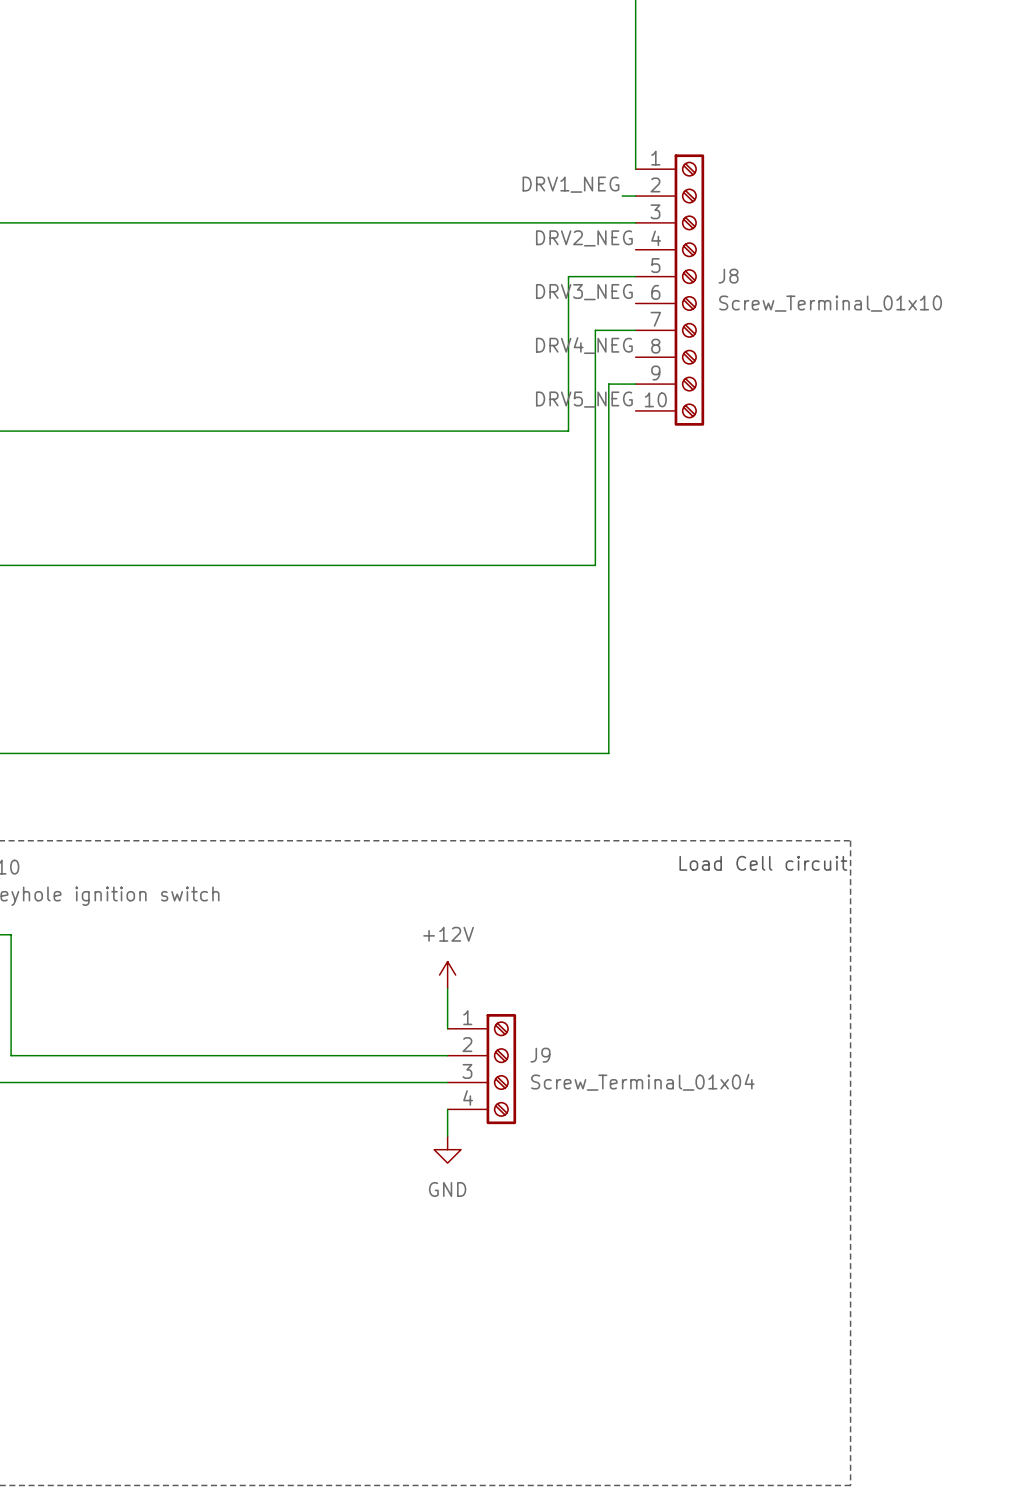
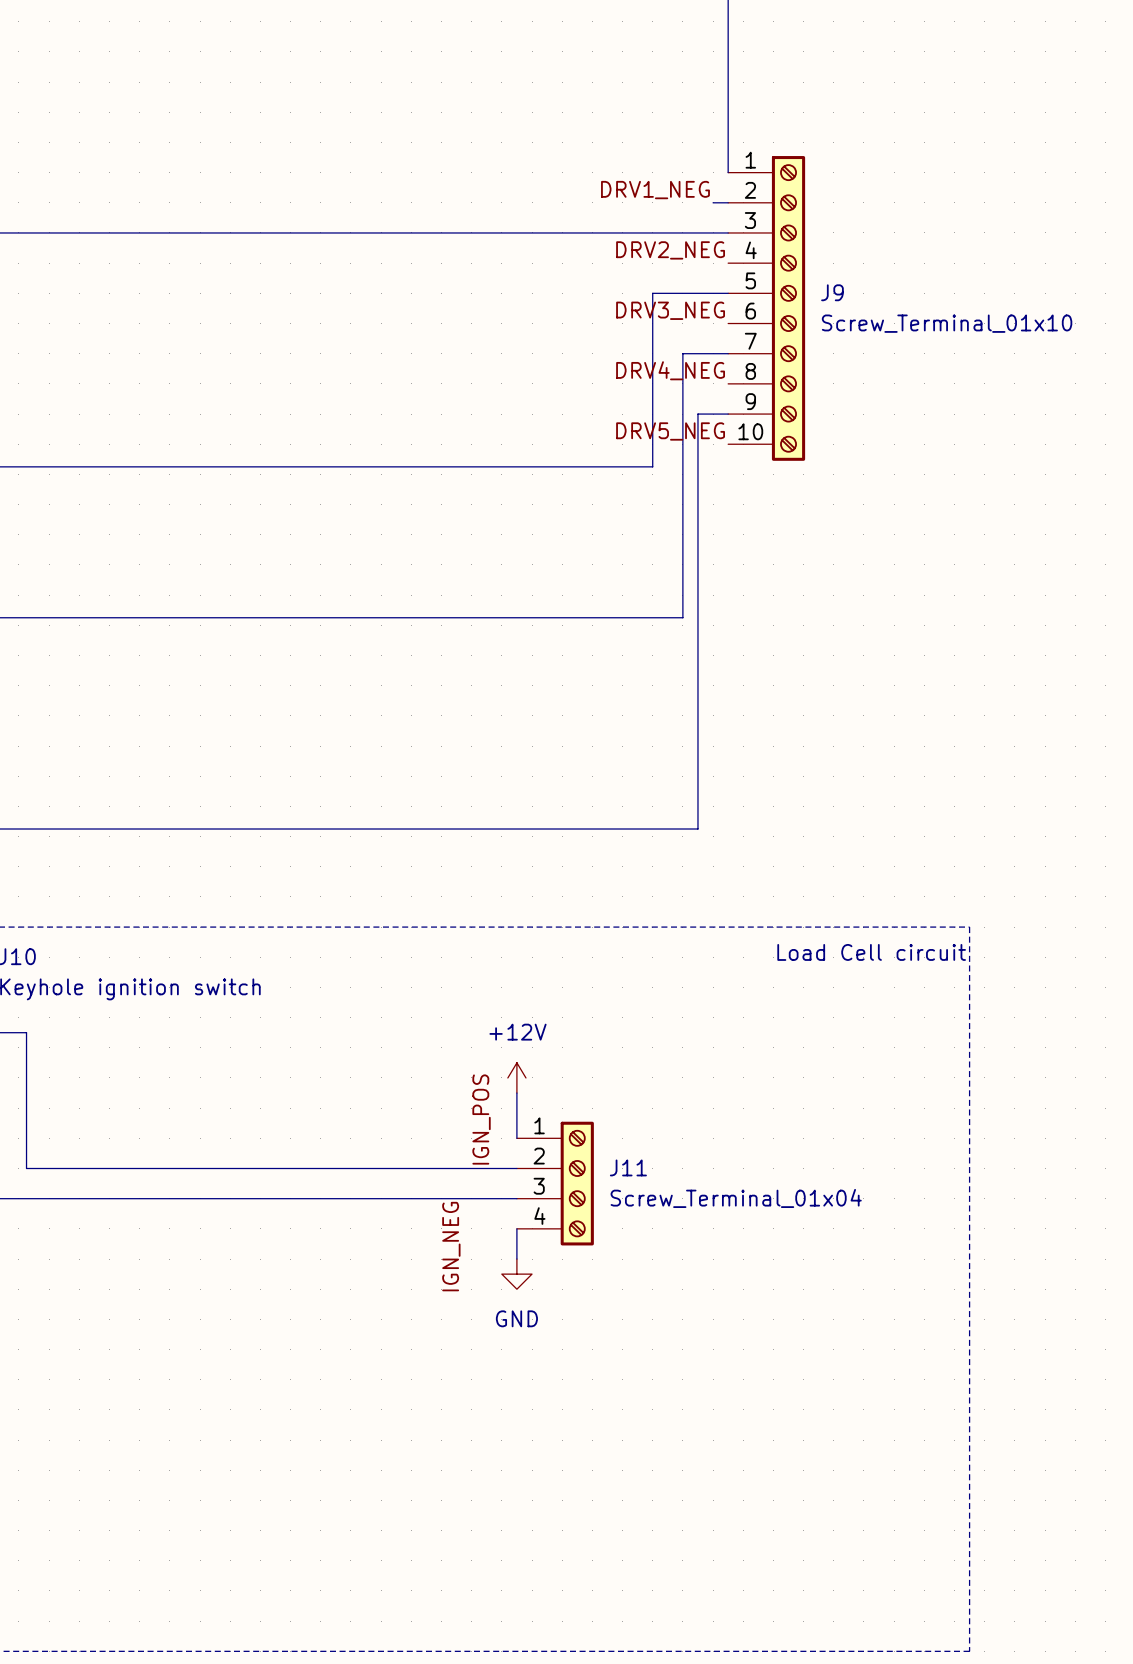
J8 name: J8 (728, 276) -> J9 (832, 292)
label: none -> IGN_POS (481, 1119)
J9 name: J9 (540, 1055) -> J11 (628, 1167)
label: none -> IGN_NEG (451, 1246)

